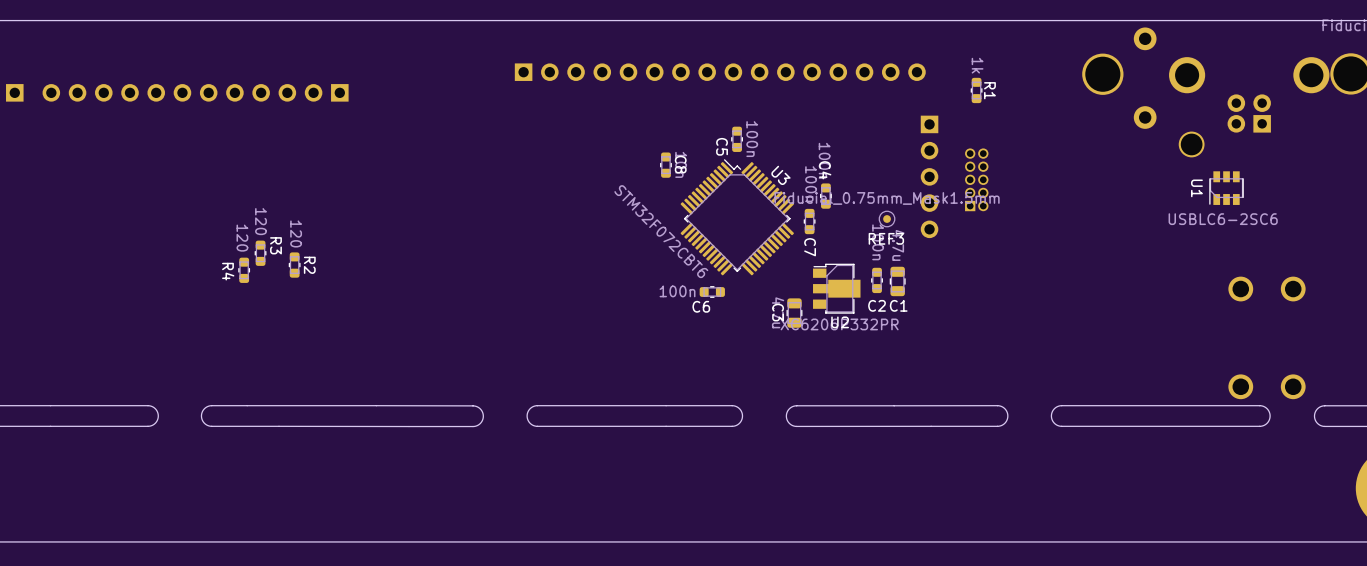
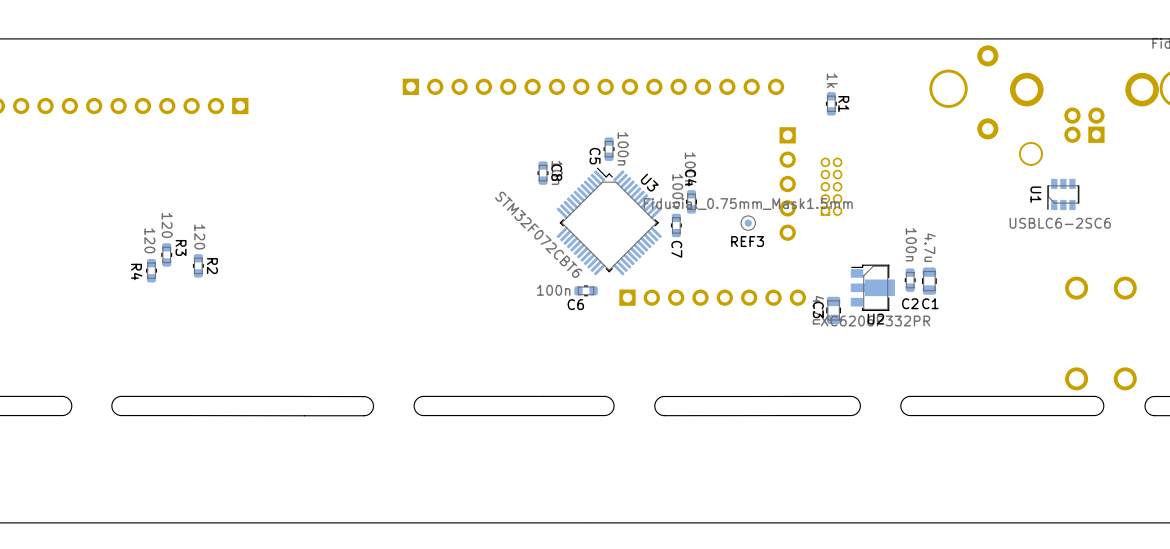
C2 position: (877, 280) -> (910, 280)
C1 position: (897, 281) -> (929, 281)
U2 position: (836, 288) -> (872, 287)
part: none -> (712, 297)
C3 position: (794, 313) -> (833, 310)

